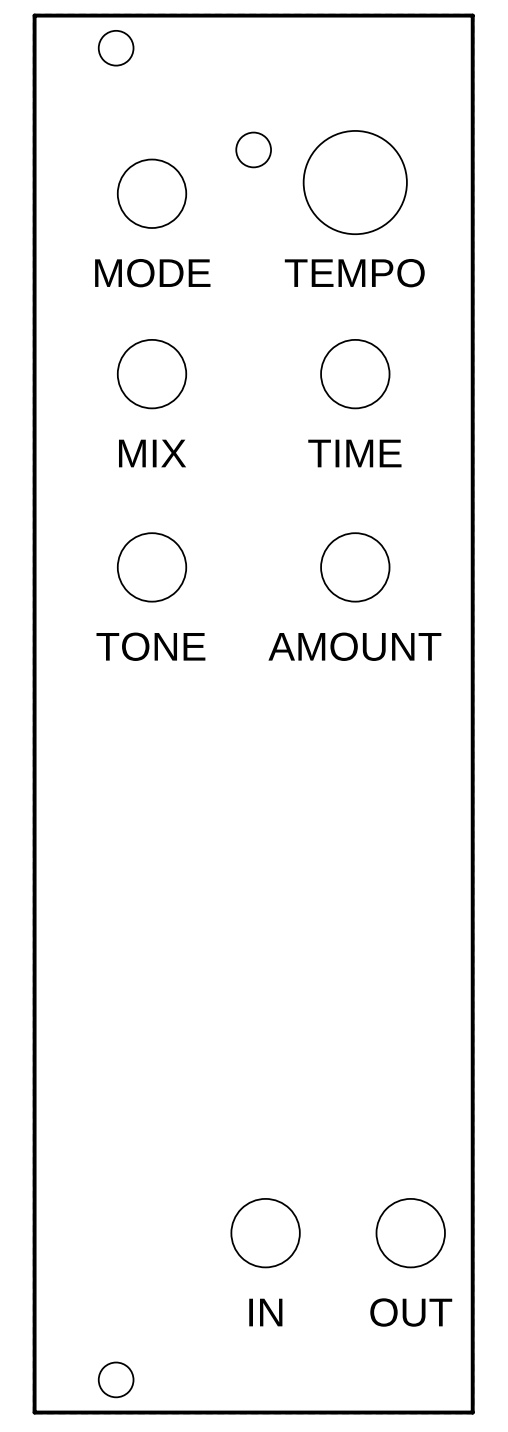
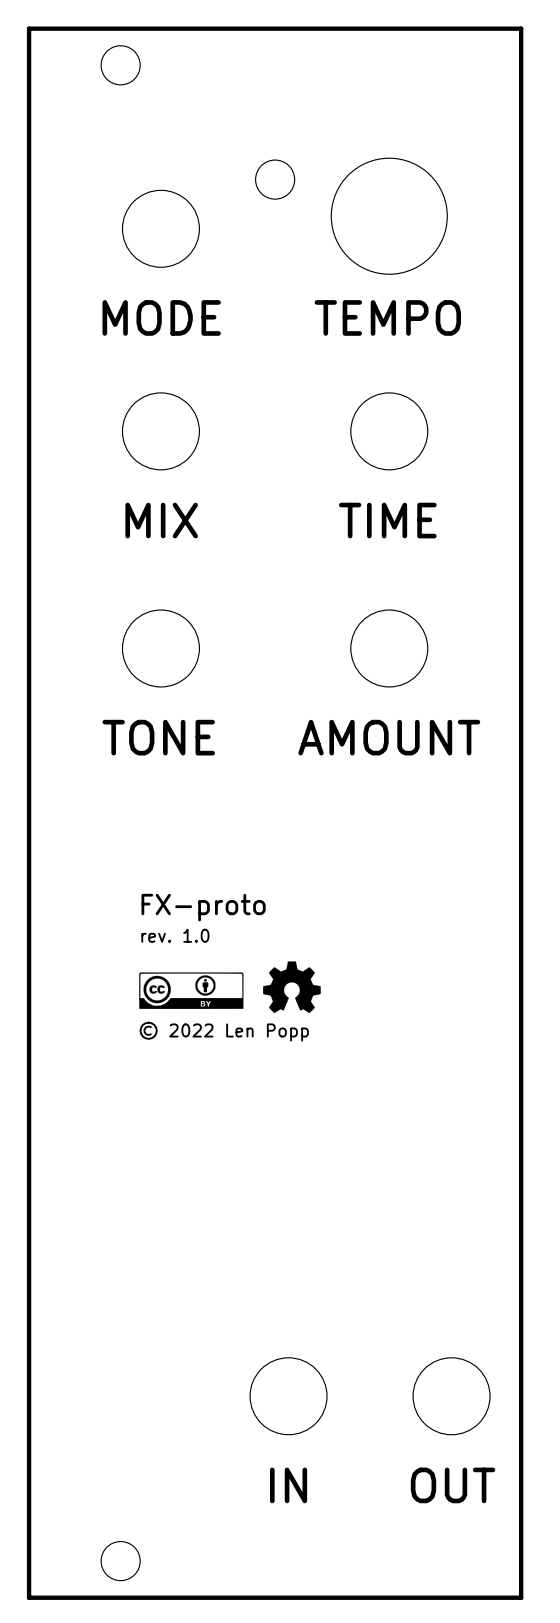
text: none -> FX-proto (203, 907)
text: none -> rev. 1.0 (175, 935)
drawing: none -> [263, 961, 321, 1014]
drawing: none -> [139, 972, 244, 1009]
text: none -> © 2022 Len Popp (224, 1031)

